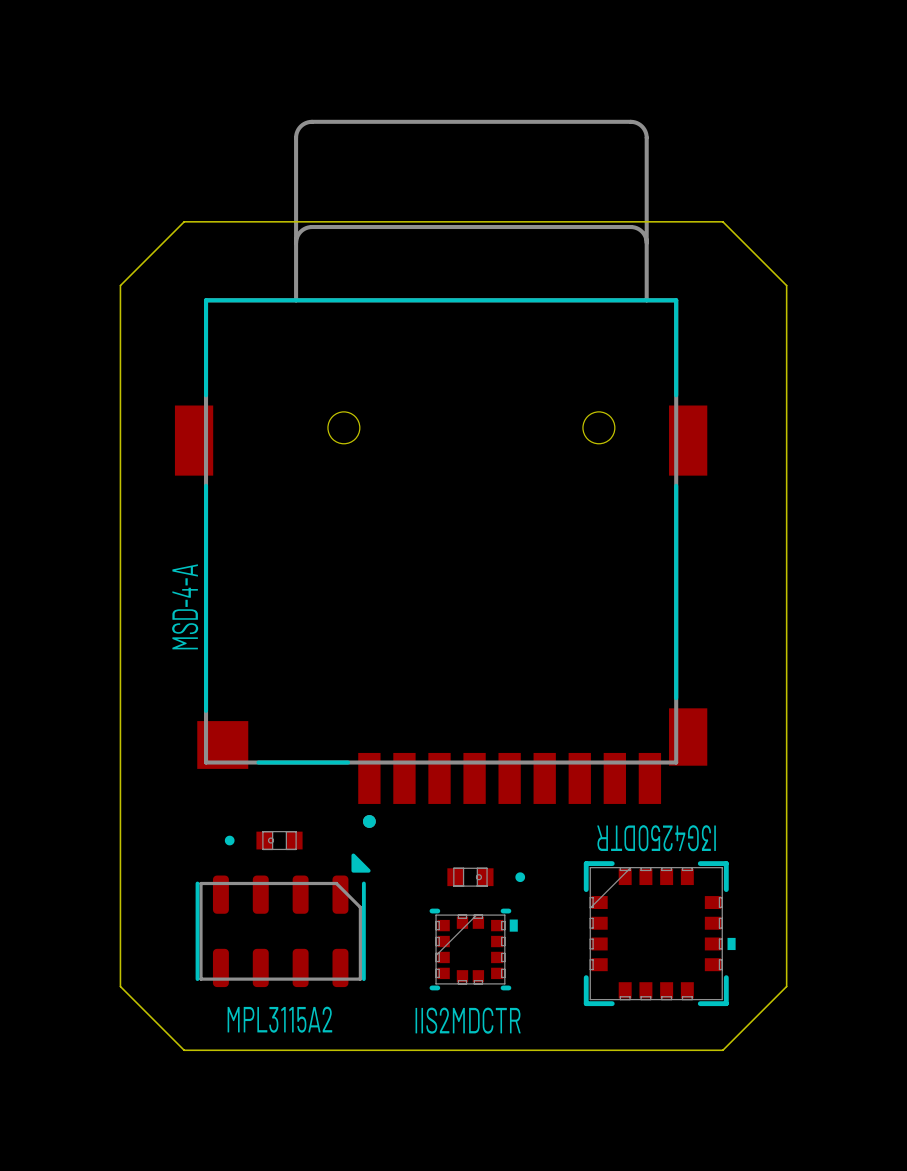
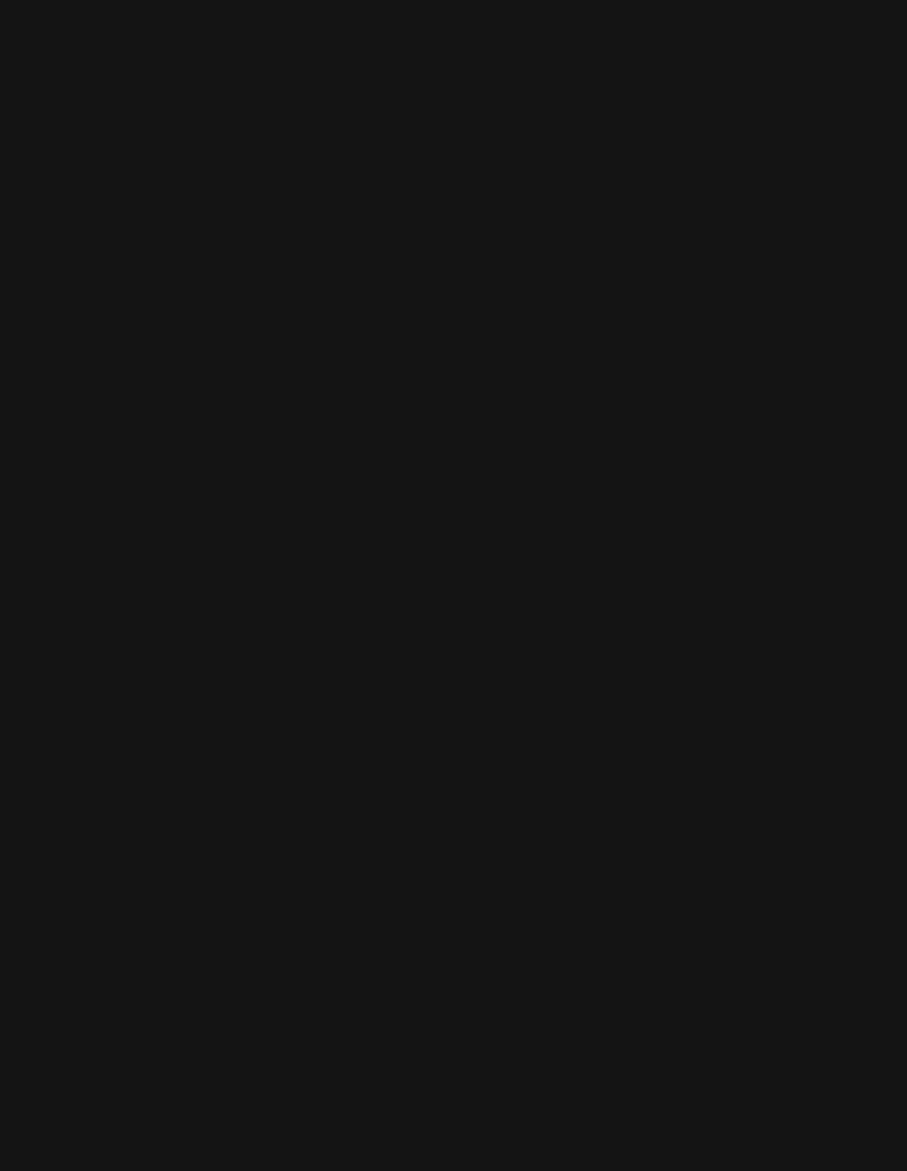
board edge: (184, 221) (120, 285) (120, 986) (184, 1050) (722, 1050) (786, 986) (786, 285) (722, 221) (184, 221) -> none
part: MSD-4-A (441, 473) -> none
part: (263, 840) -> none
part: (486, 877) -> none
part: MPL3115A2 (283, 920) -> none
part: I3G4250DTR (659, 933) -> none
part: IIS2MDCTR (473, 949) -> none

